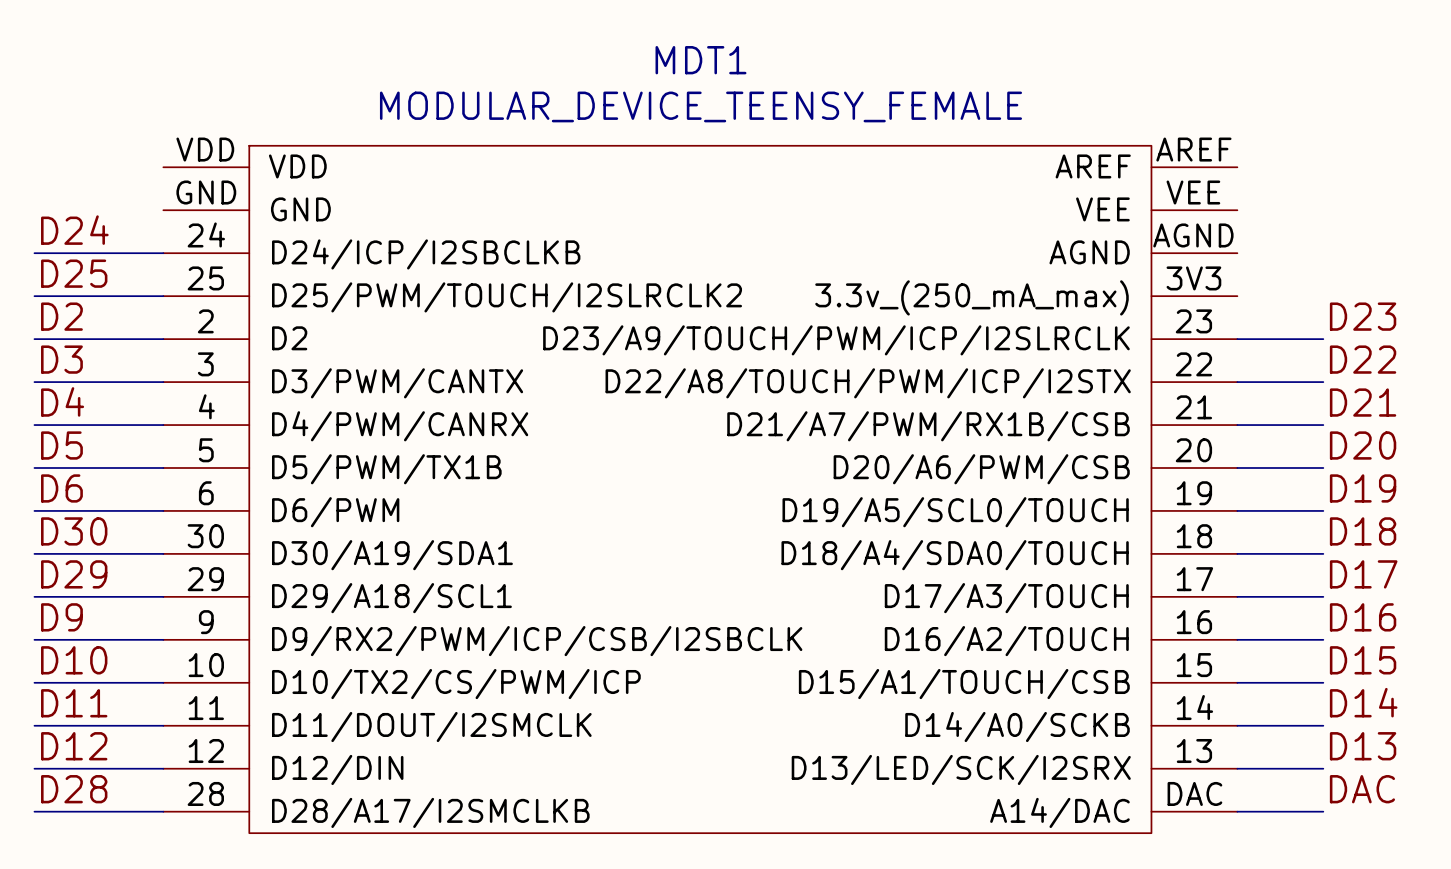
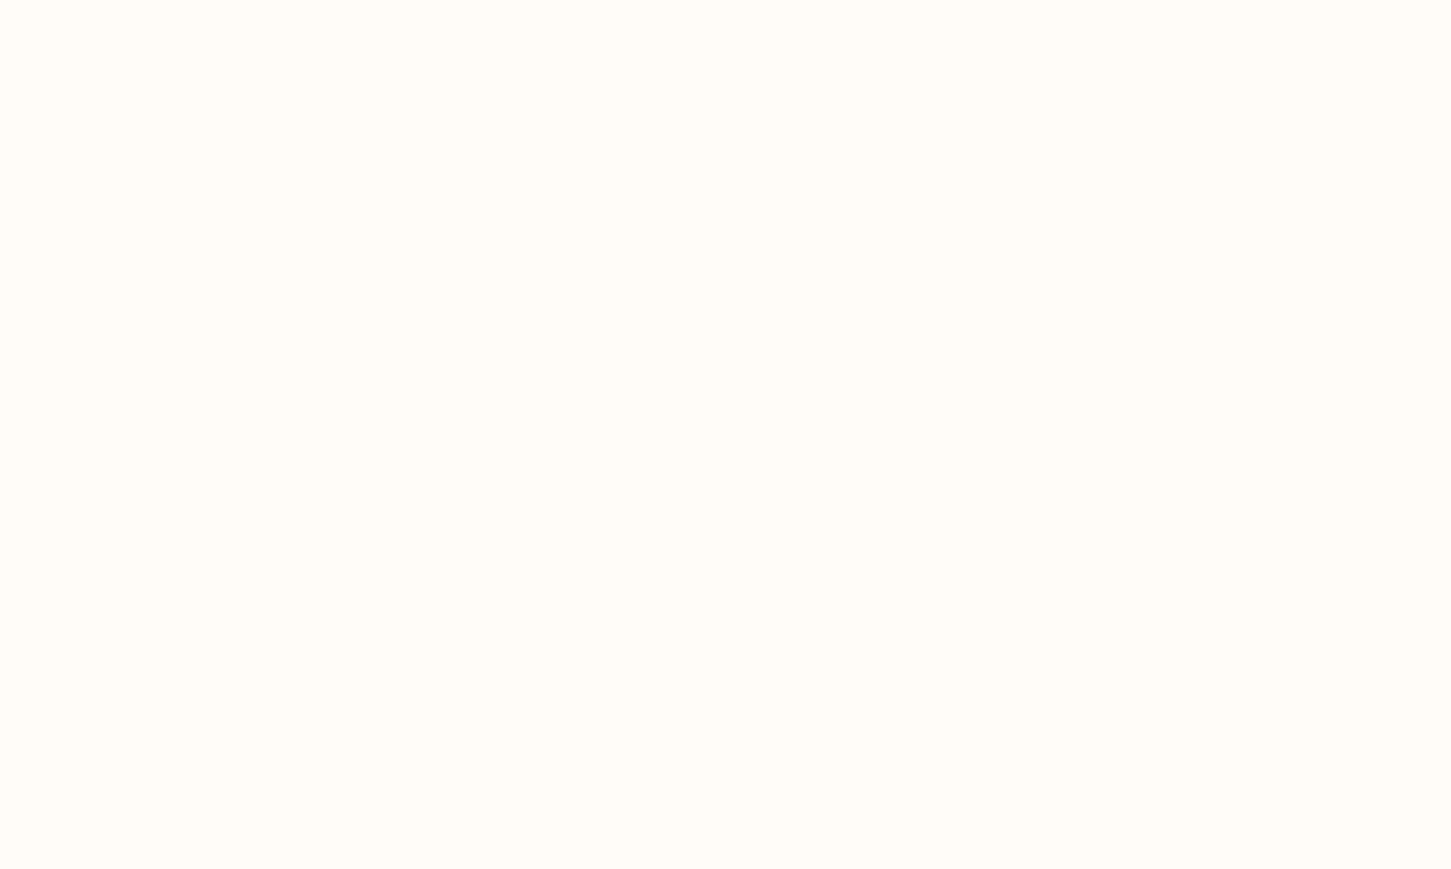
label: D24 (74, 230) -> none
wire: (34, 253) (163, 253) -> none
label: D25 (74, 273) -> none
wire: (34, 296) (163, 296) -> none
label: D2 (61, 316) -> none
label: D23 (1363, 316) -> none
wire: (34, 339) (163, 339) -> none
wire: (1237, 339) (1323, 339) -> none
label: D3 (61, 359) -> none
label: D22 (1363, 359) -> none
wire: (34, 382) (163, 382) -> none
wire: (1237, 382) (1323, 382) -> none
label: D4 (62, 401) -> none
label: D21 (1363, 402) -> none
wire: (34, 425) (163, 425) -> none
wire: (1237, 425) (1323, 425) -> none
label: D5 (61, 445) -> none
label: D20 (1363, 445) -> none
wire: (34, 468) (163, 468) -> none
wire: (1237, 468) (1323, 468) -> none
label: D6 (61, 488) -> none
label: D19 (1363, 488) -> none
MDT1: MODULAR_DEVICE_TEENSY_FEMALE (700, 489) -> none
wire: (34, 510) (163, 510) -> none
wire: (1237, 510) (1323, 510) -> none
label: D30 (74, 531) -> none
label: D18 (1363, 531) -> none
wire: (34, 553) (163, 553) -> none
wire: (1237, 553) (1323, 553) -> none
label: D29 (74, 574) -> none
label: D17 (1363, 574) -> none
wire: (34, 596) (163, 596) -> none
wire: (1237, 596) (1323, 596) -> none
label: D9 (61, 617) -> none
label: D16 (1363, 617) -> none
wire: (34, 639) (163, 639) -> none
wire: (1237, 639) (1323, 639) -> none
label: D10 (74, 660) -> none
label: D15 (1363, 660) -> none
wire: (34, 682) (163, 682) -> none
wire: (1237, 682) (1323, 682) -> none
label: D14 (1363, 702) -> none
label: D11 (74, 703) -> none
wire: (34, 725) (163, 725) -> none
wire: (1237, 725) (1323, 725) -> none
label: D12 (74, 746) -> none
label: D13 (1363, 746) -> none
wire: (34, 768) (163, 768) -> none
wire: (1237, 768) (1323, 768) -> none
label: D28 (74, 789) -> none
label: DAC (1362, 789) -> none
wire: (34, 811) (163, 811) -> none
wire: (1237, 811) (1323, 811) -> none

